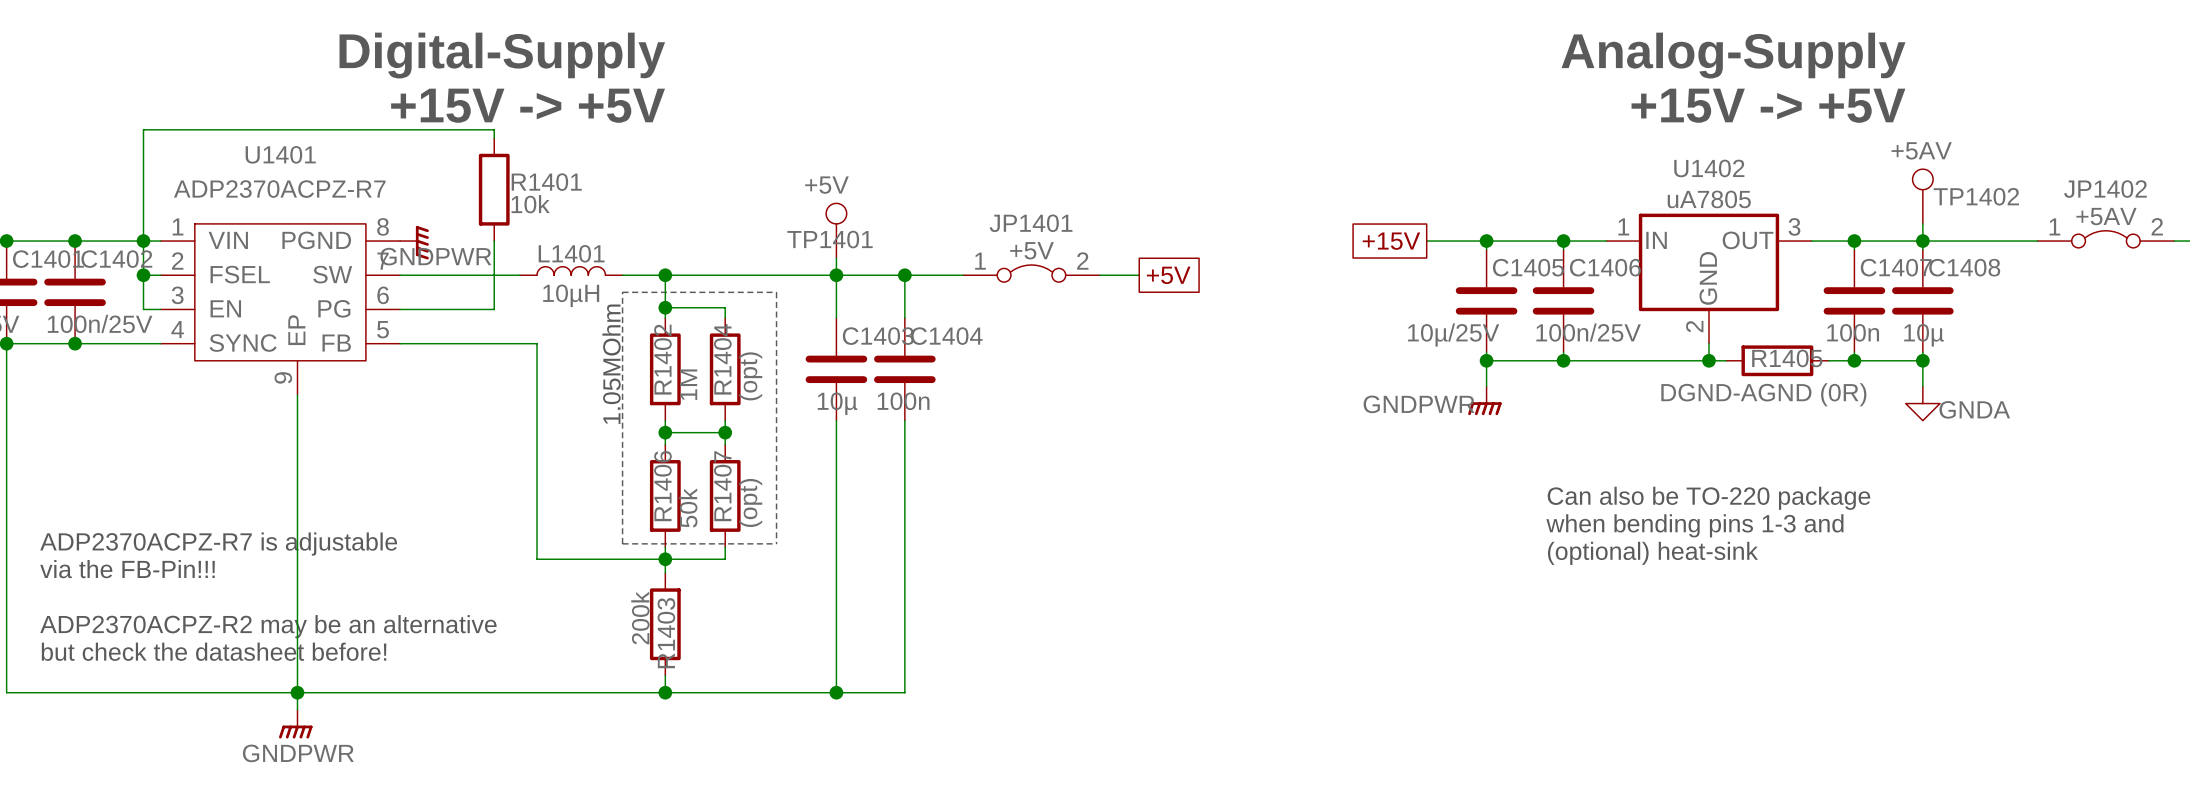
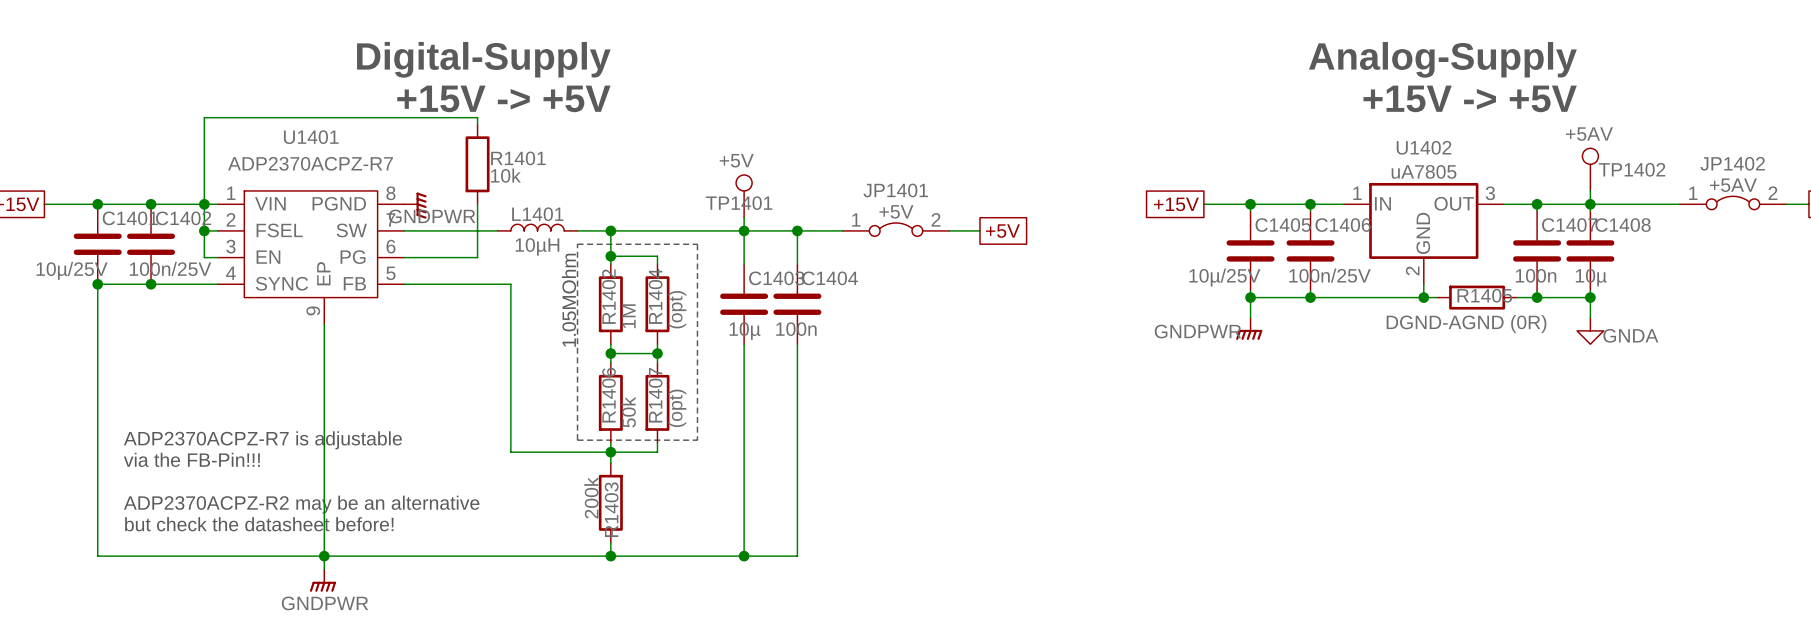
text: Can also be TO-220 package (1708, 498) -> none
text: when bending pins 1-3 and (1694, 525) -> none
text: (optional) heat-sink (1652, 553) -> none

